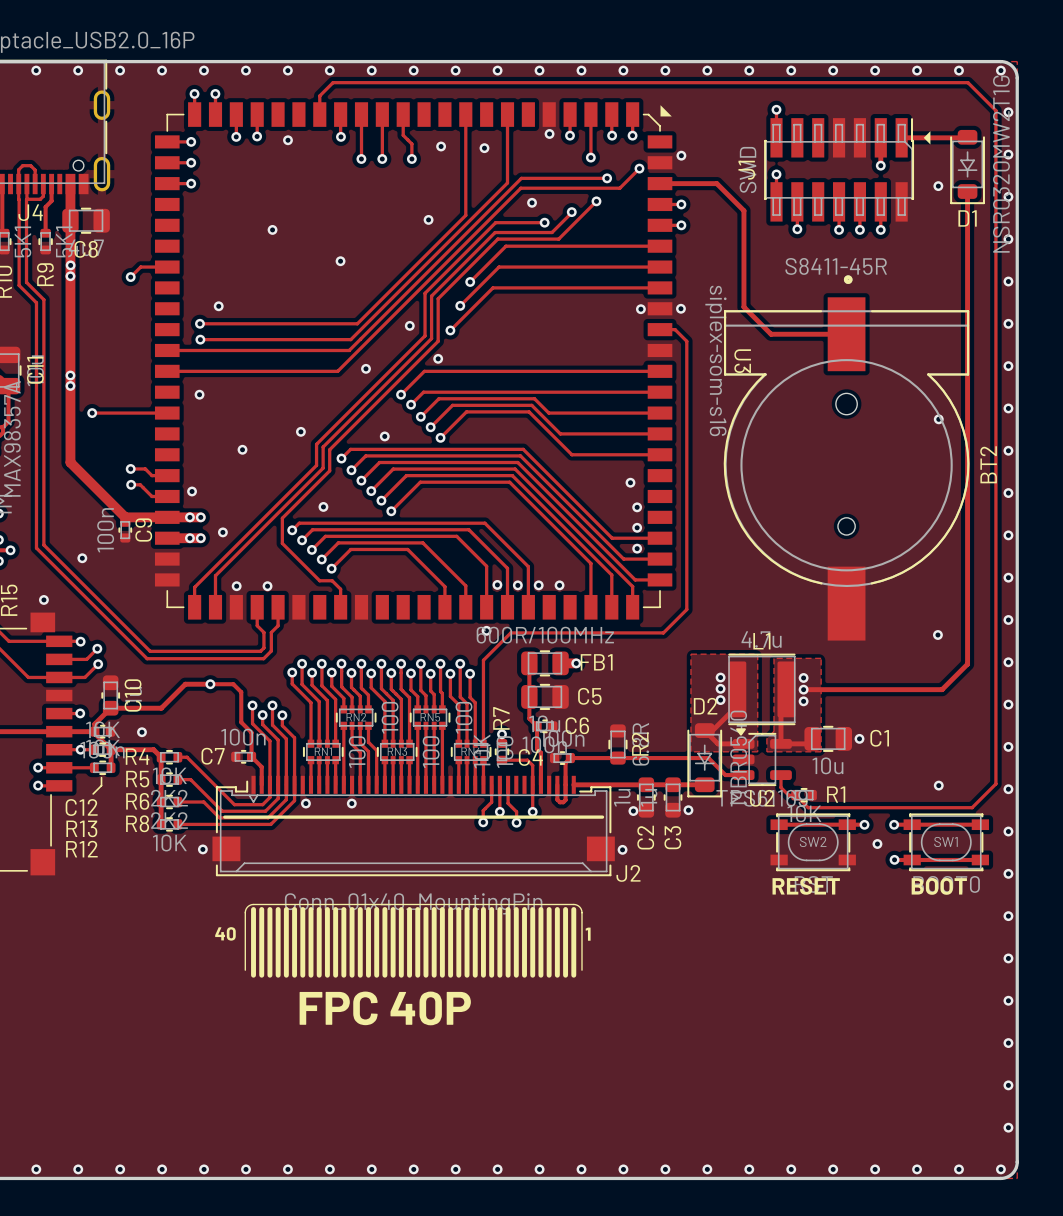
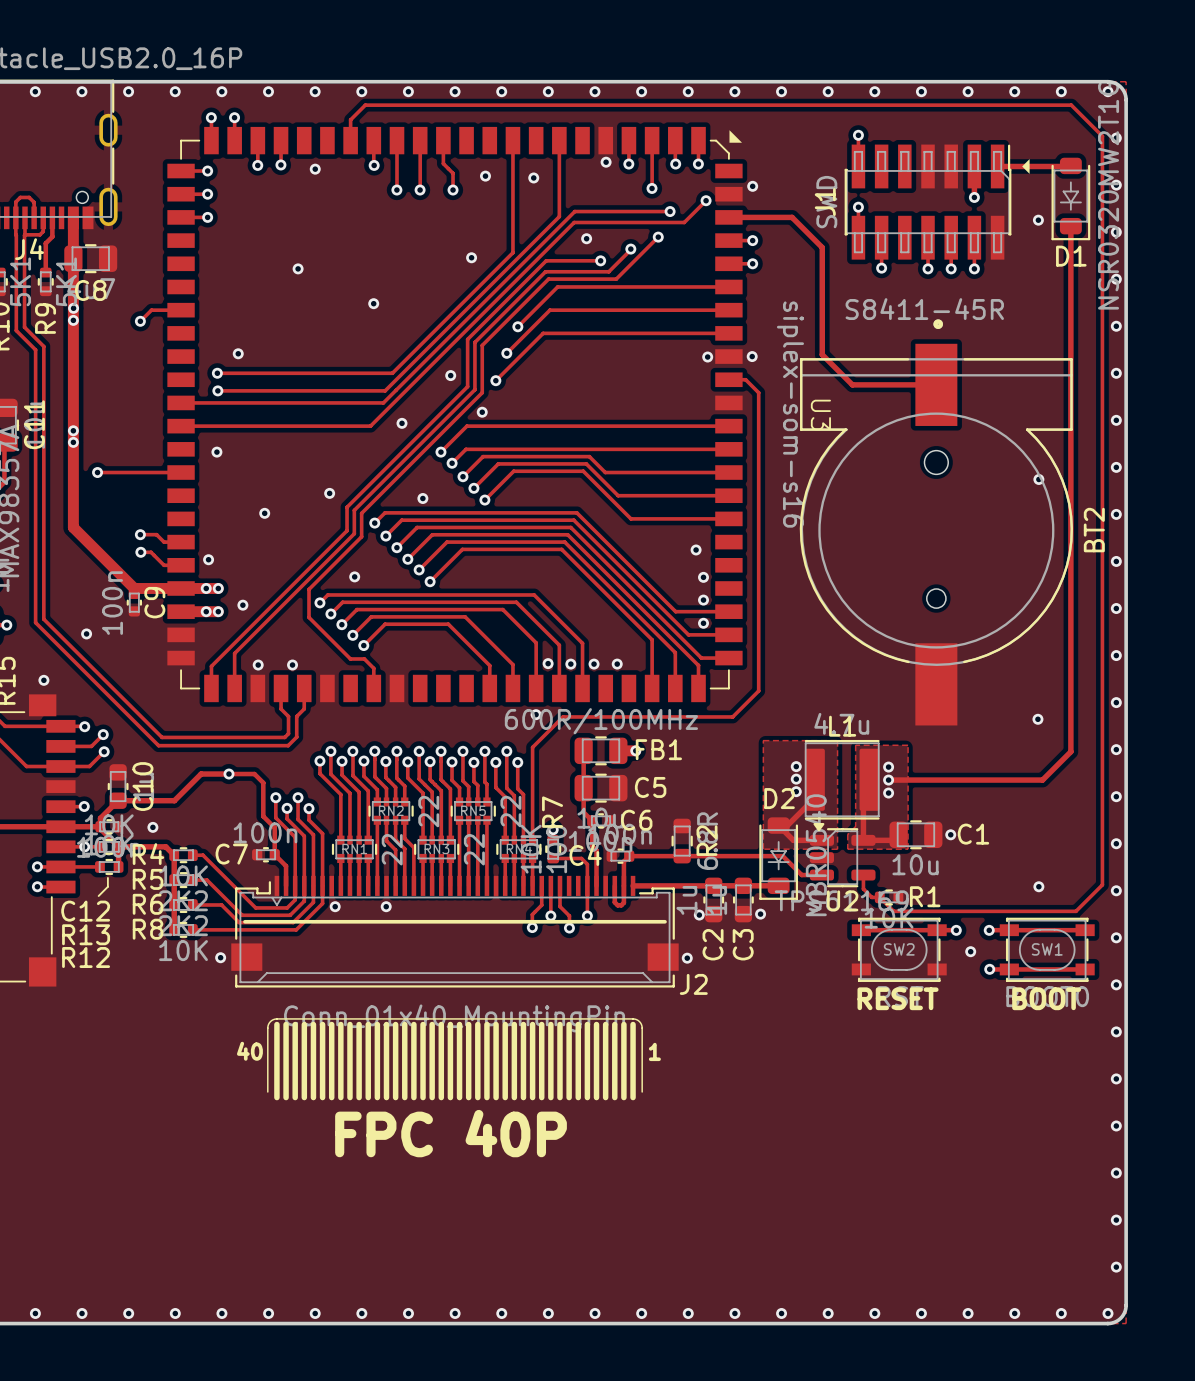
RN2 value: 100 (390, 717) -> 22 (428, 811)
RN5 value: 100 (463, 717) -> 22 (510, 811)
RN1 value: 100 (357, 752) -> 22 (392, 849)
RN3 value: 100 (431, 752) -> 22 (474, 849)

